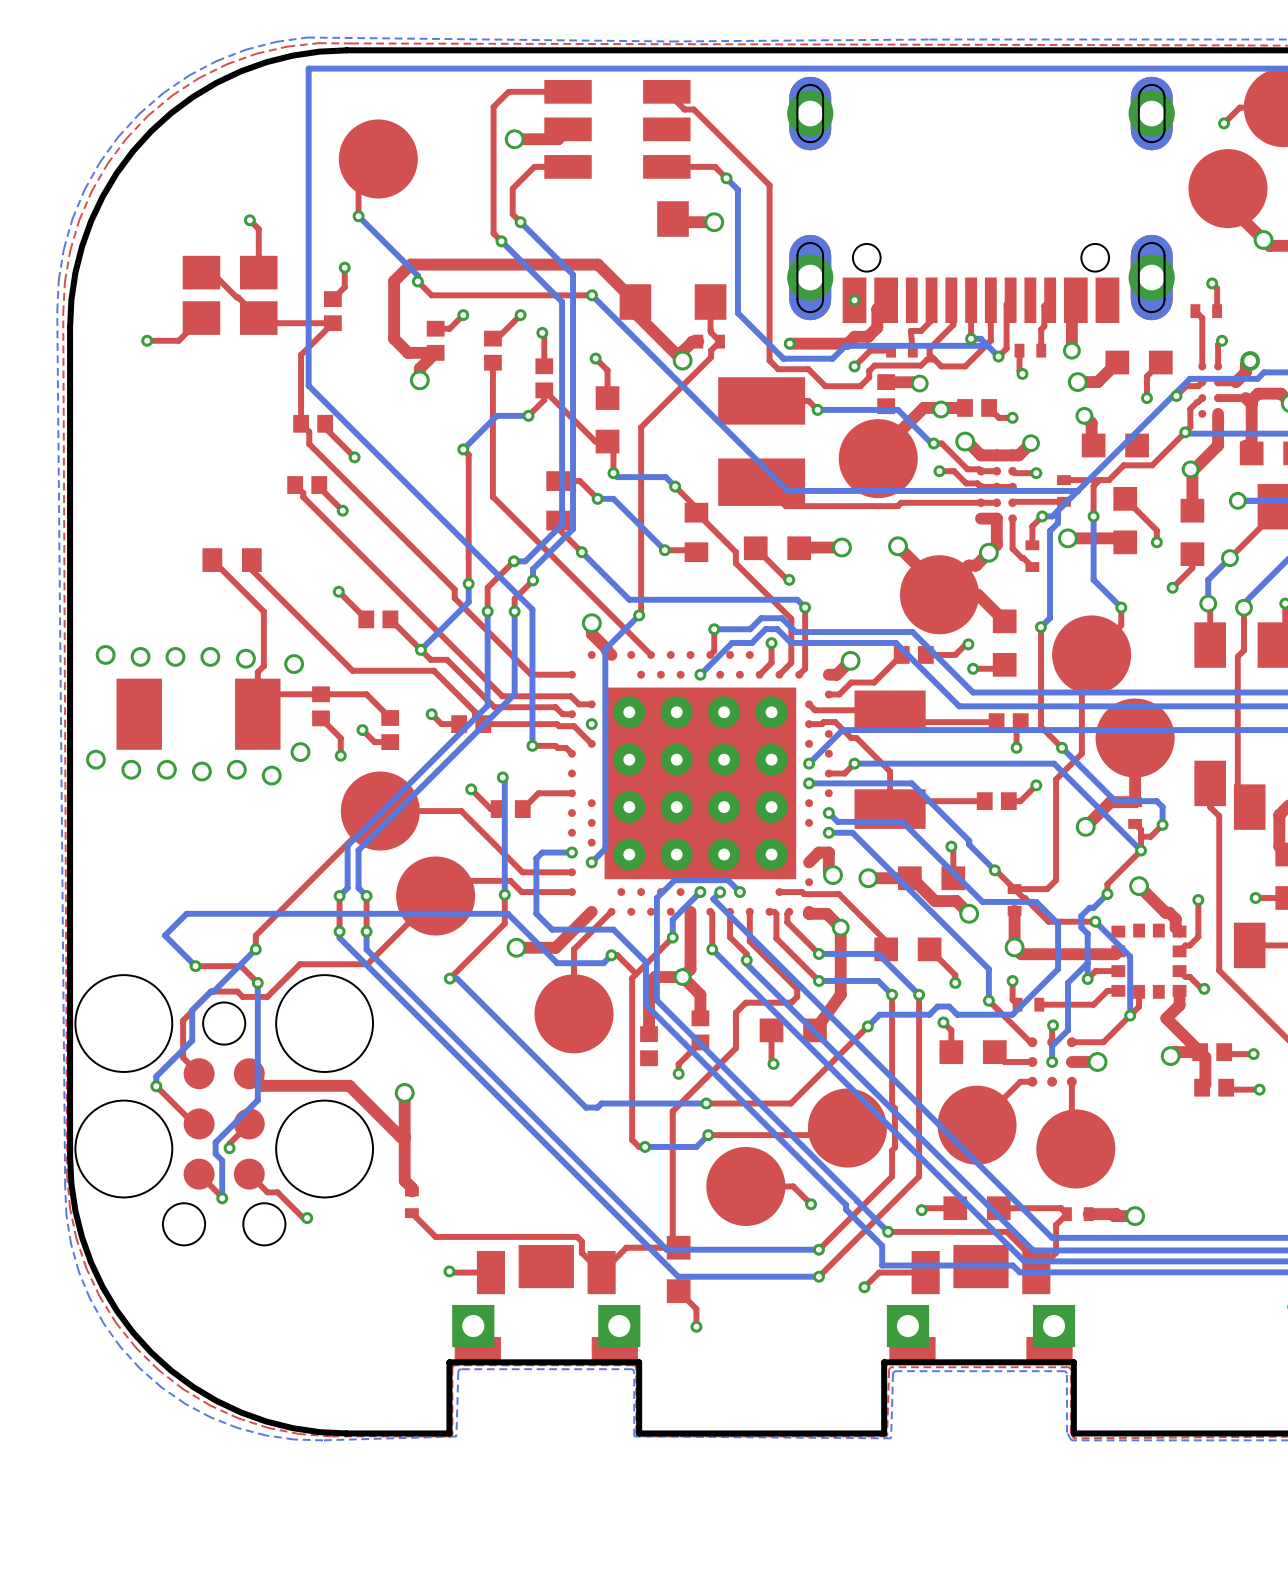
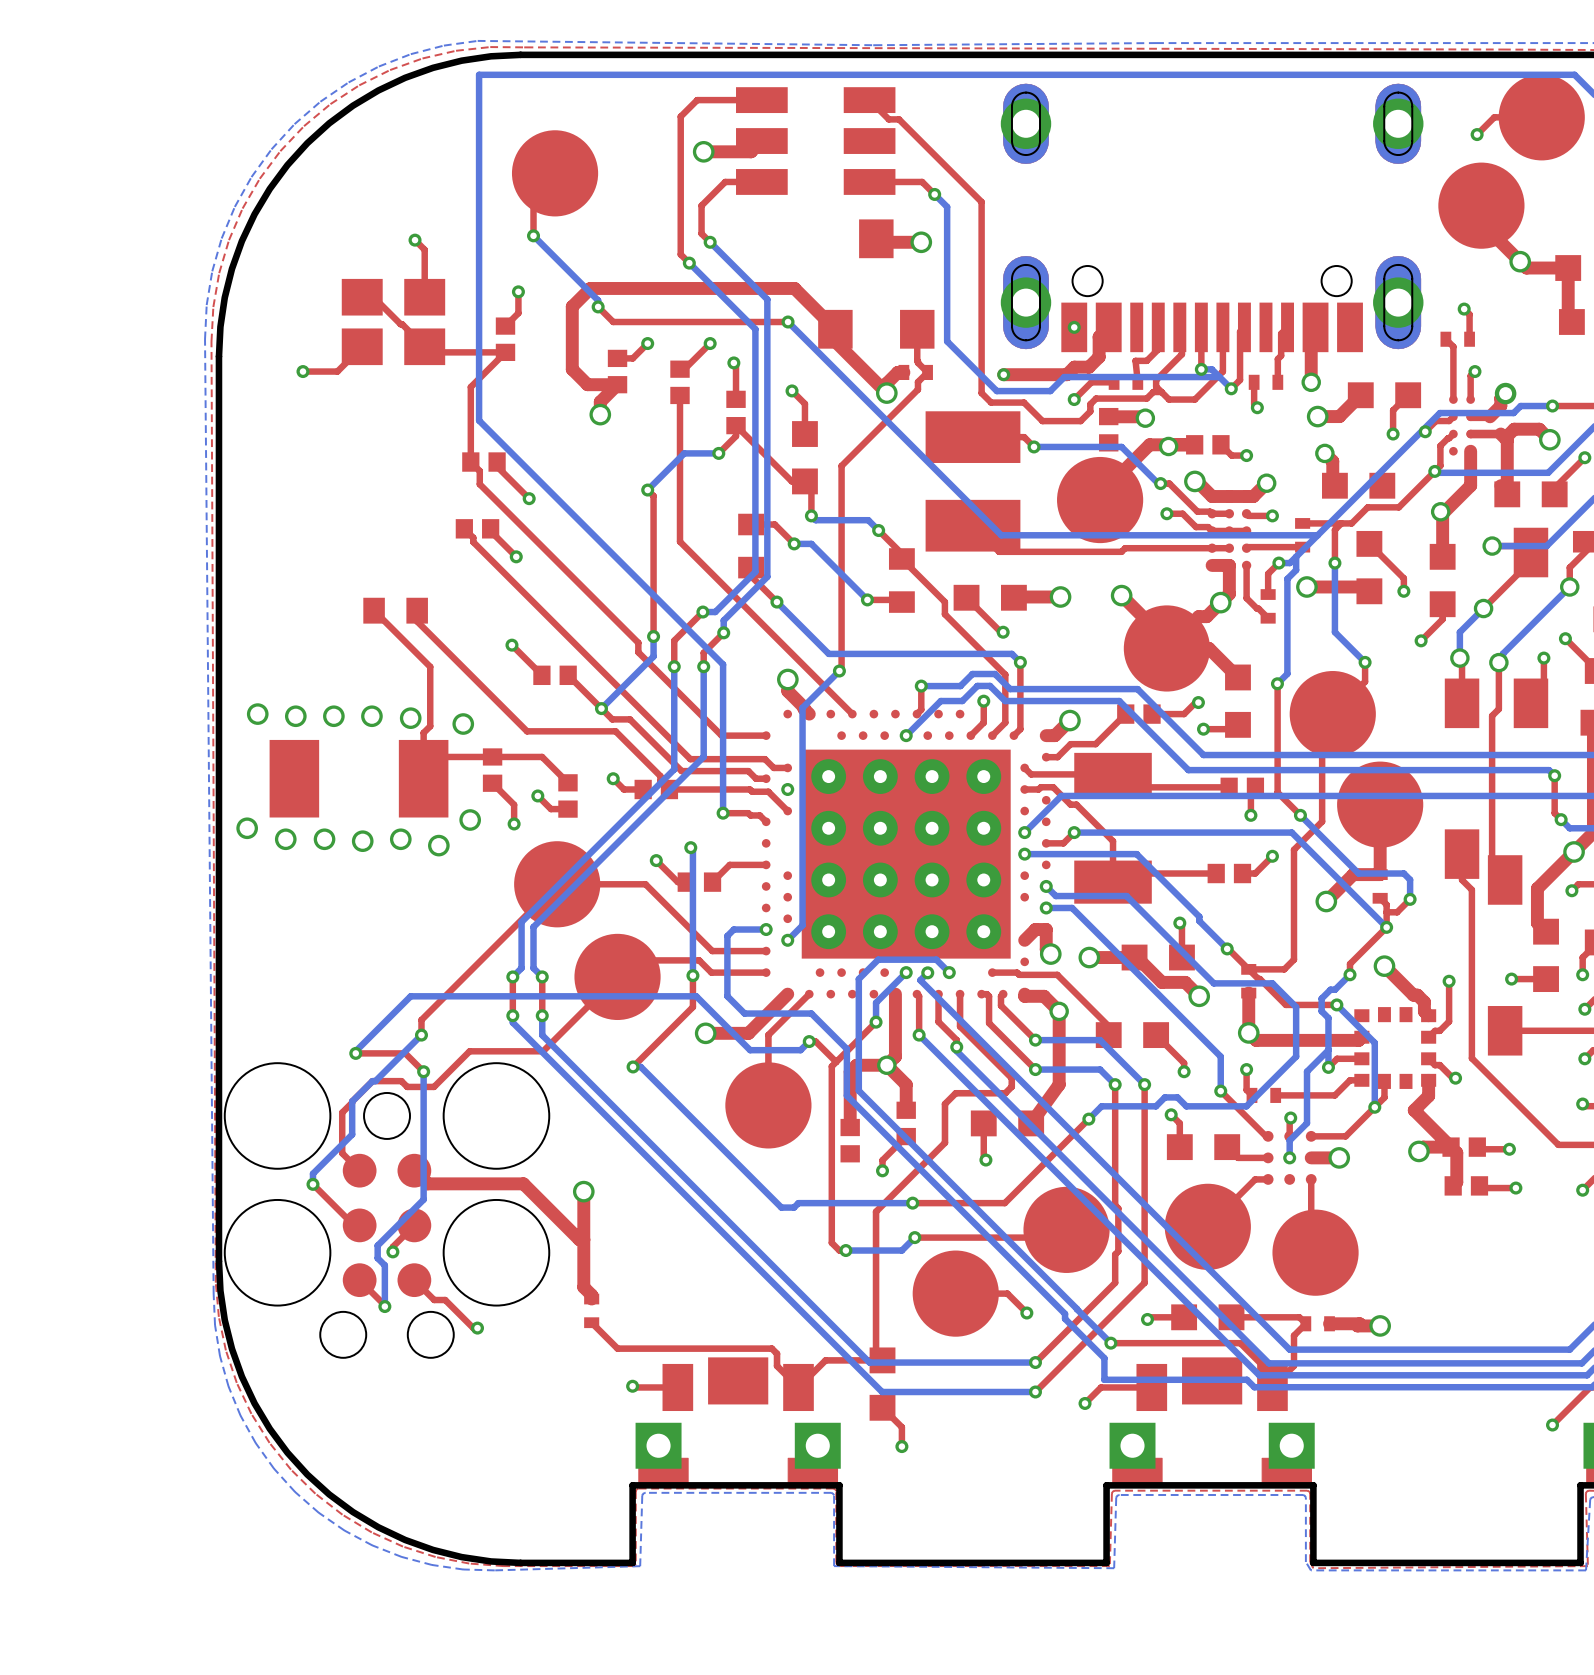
bottom track: (245, 913) (186, 913) (164, 935) (194, 965) -> (410, 996) (354, 1052)

